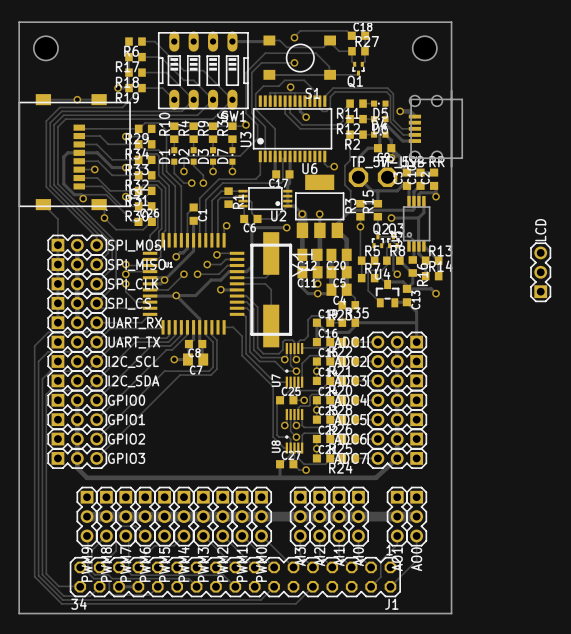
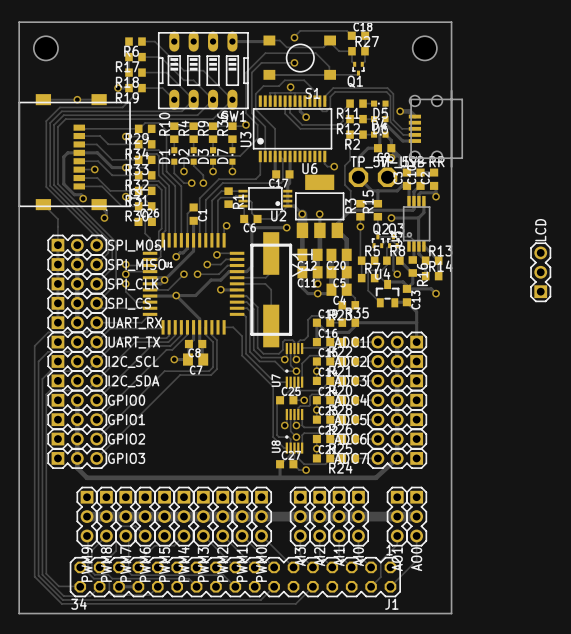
track: (81, 194) (106, 194) (133, 221) (138, 221) -> none
track: (104, 209) (104, 218) (116, 229) (143, 229) (151, 221) -> (104, 209) (106, 216)
track: (145, 212) (147, 214) (154, 214) (157, 217) (157, 227) (150, 235) (150, 238) -> (145, 212) (145, 233) (150, 238)

